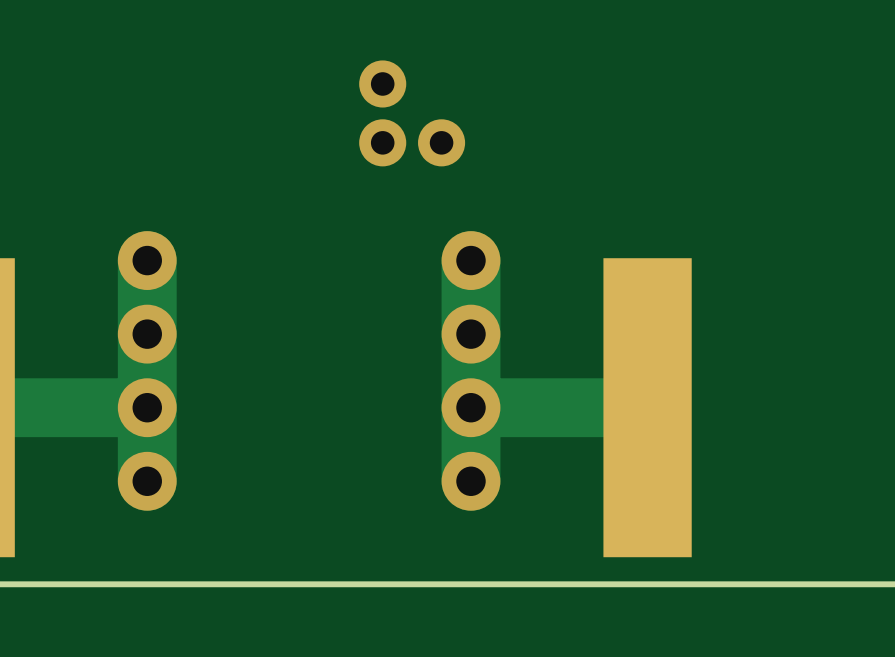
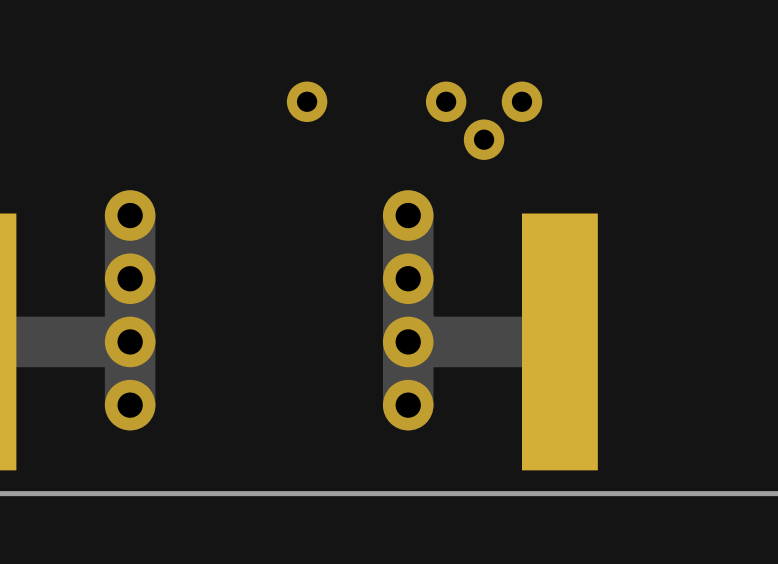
via: (382, 83) -> none
via: none -> (307, 101)
via: none -> (446, 101)
via: none -> (521, 101)
via: (382, 142) -> none
via: (441, 142) -> none
via: none -> (484, 139)

